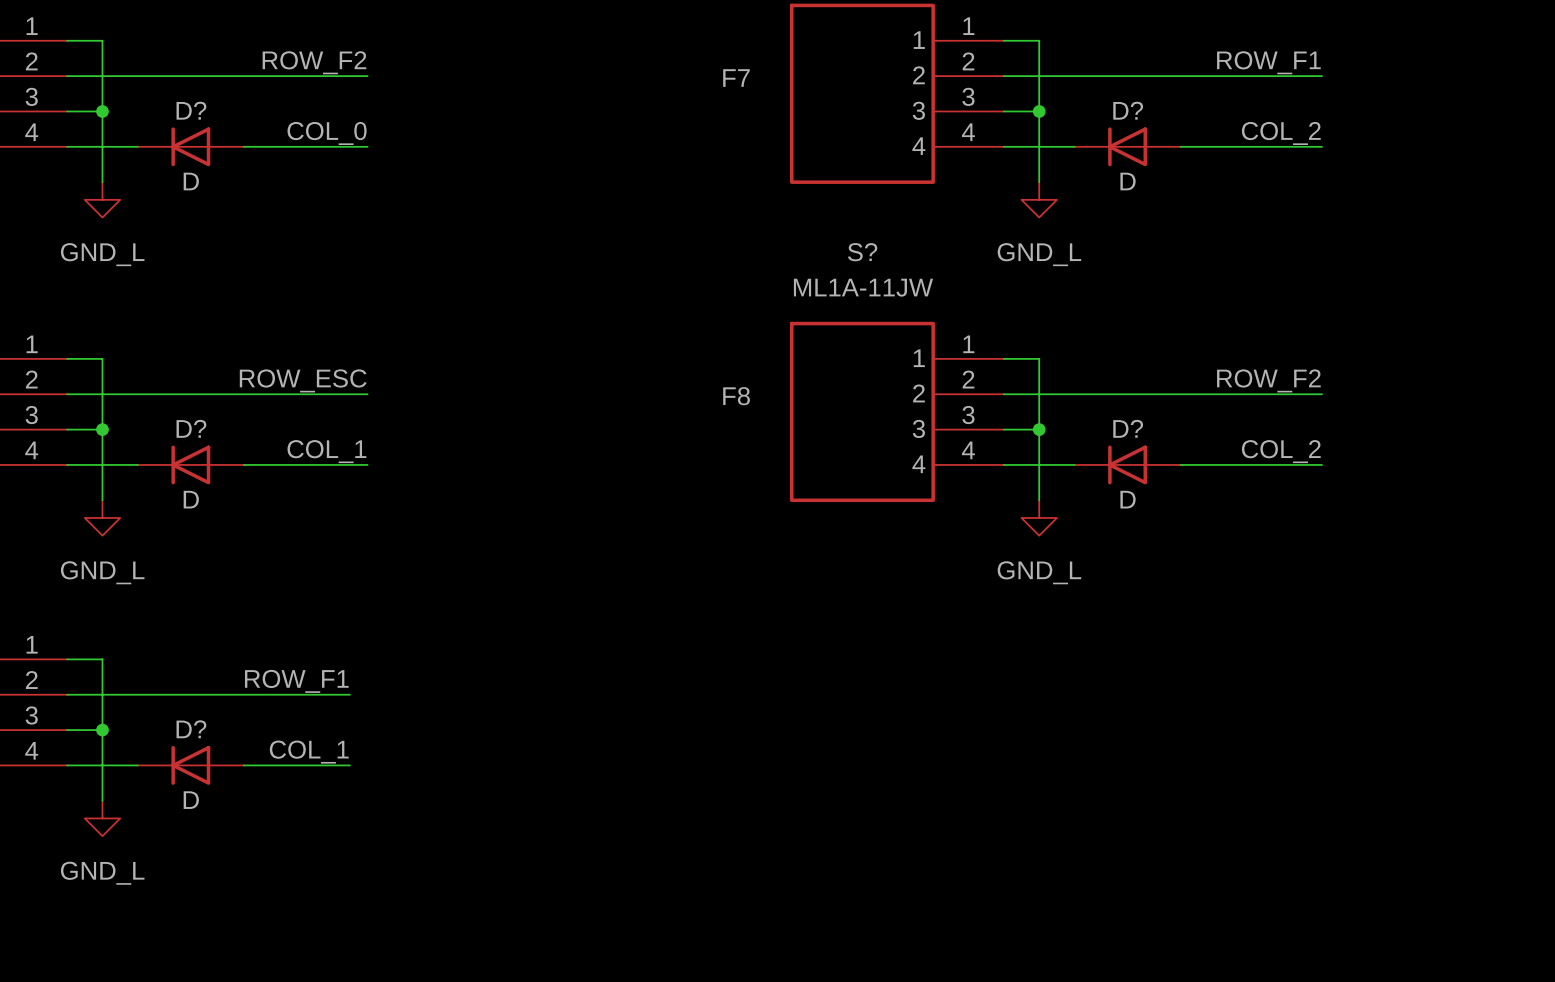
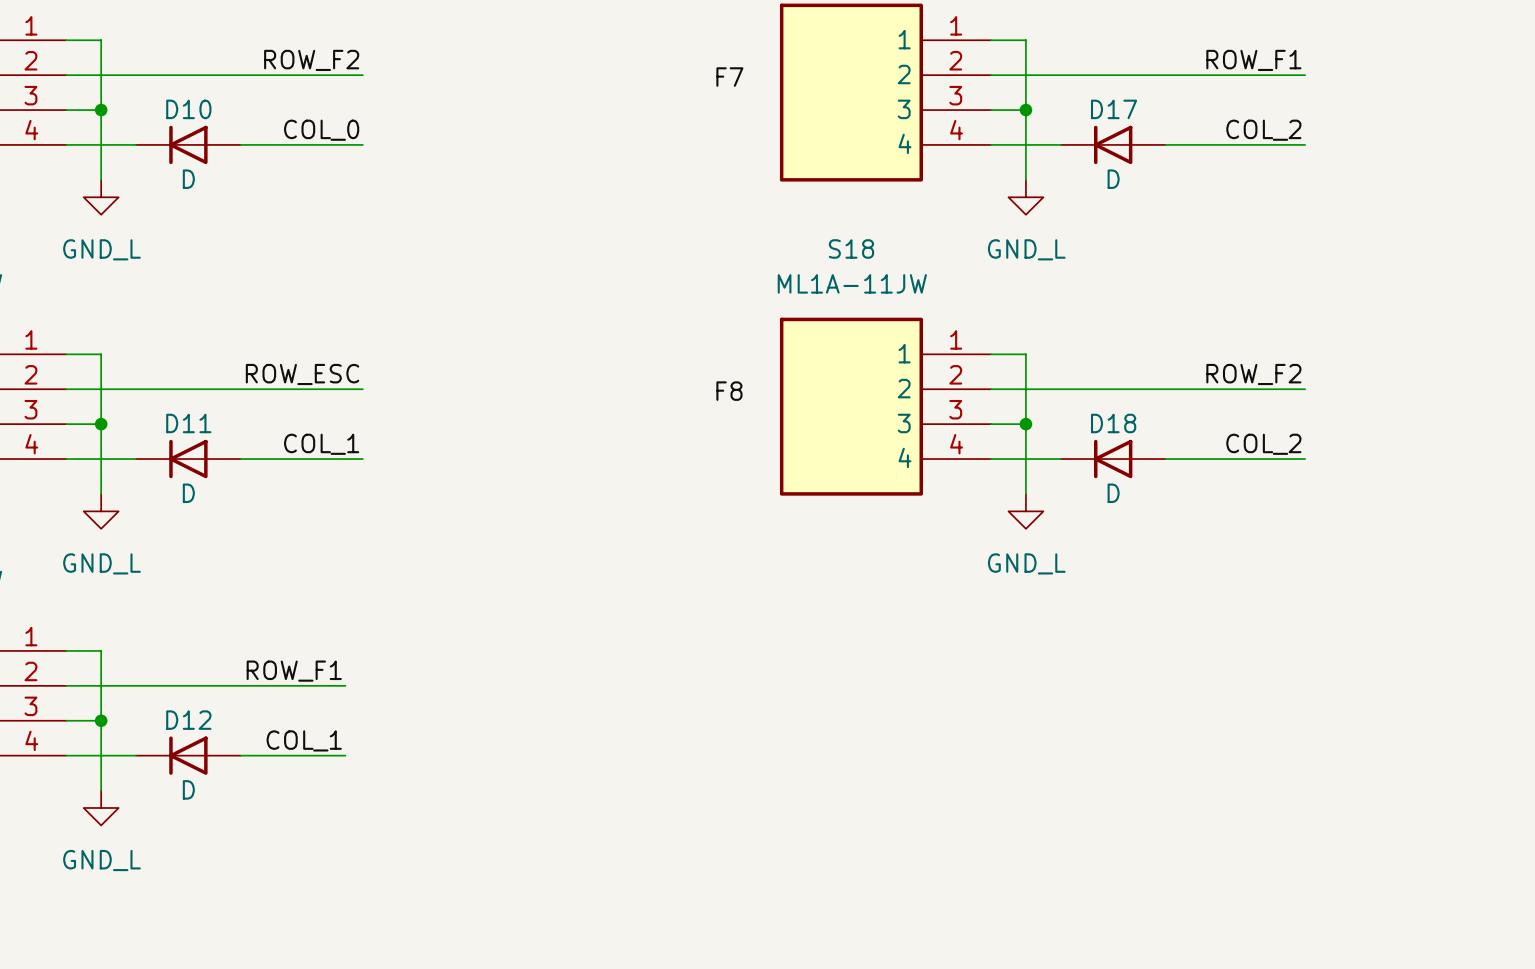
D? name: D? (191, 110) -> D10 (188, 109)
D? name: D? (1128, 110) -> D17 (1114, 109)
S? name: S? (862, 252) -> S18 (851, 248)
D? name: D? (191, 428) -> D11 (188, 423)
D? name: D? (1128, 428) -> D18 (1113, 423)
D? name: D? (191, 729) -> D12 (188, 720)

